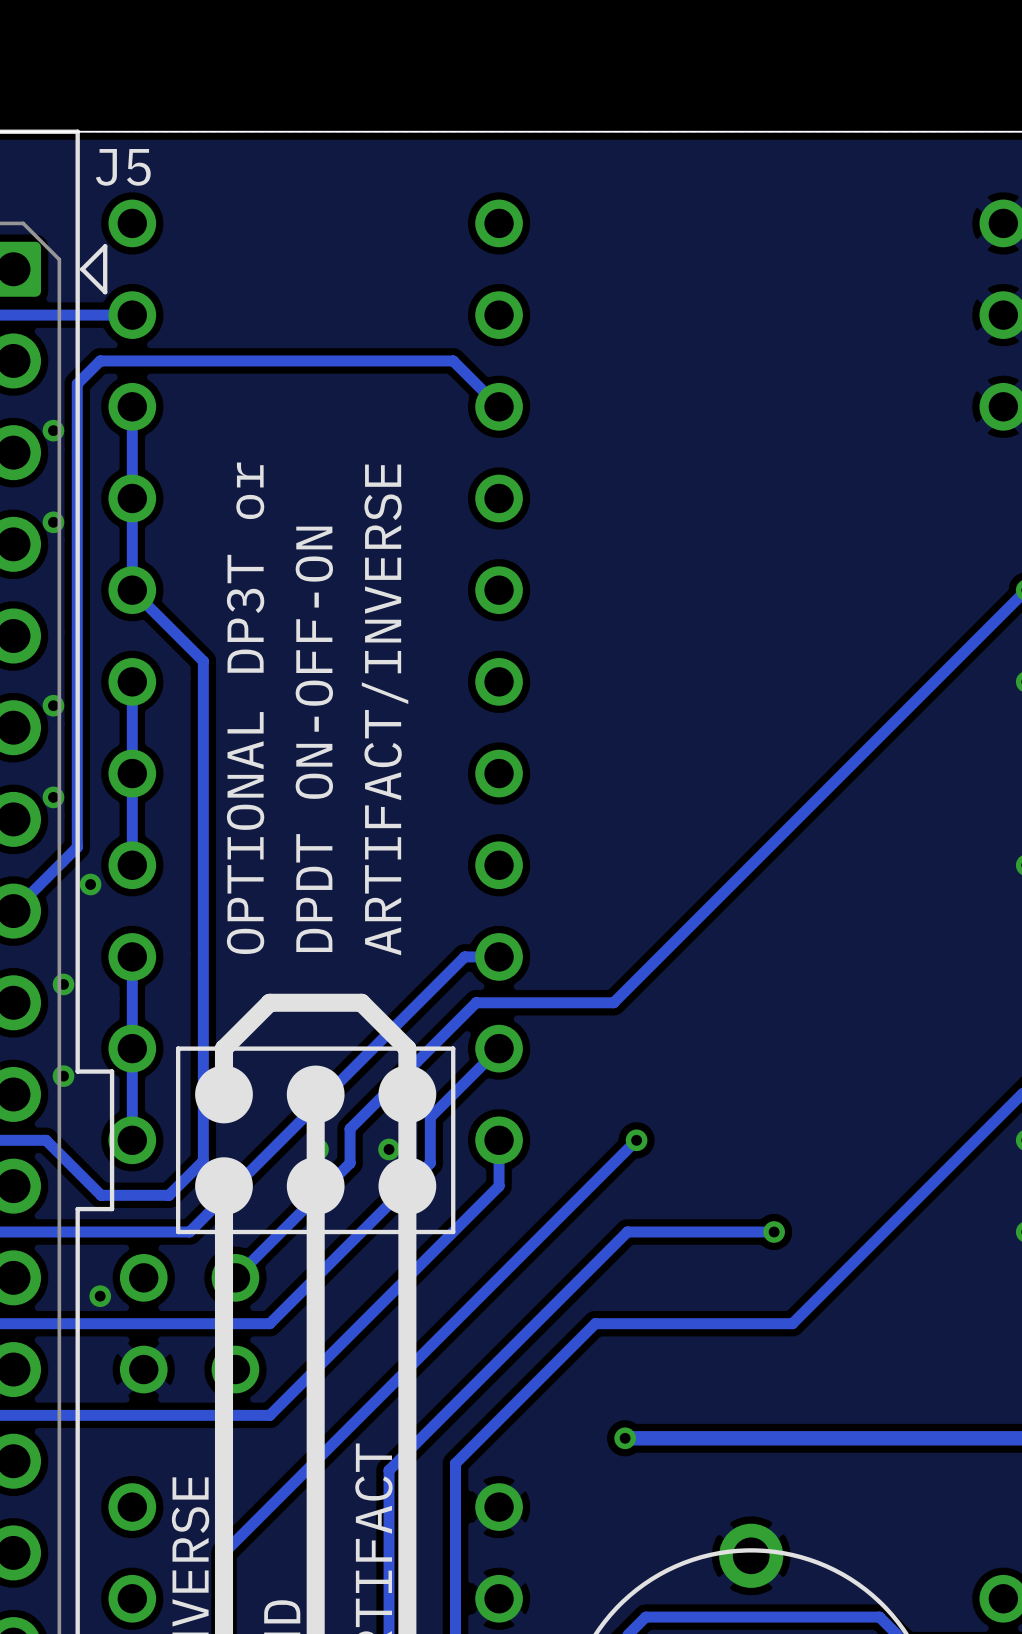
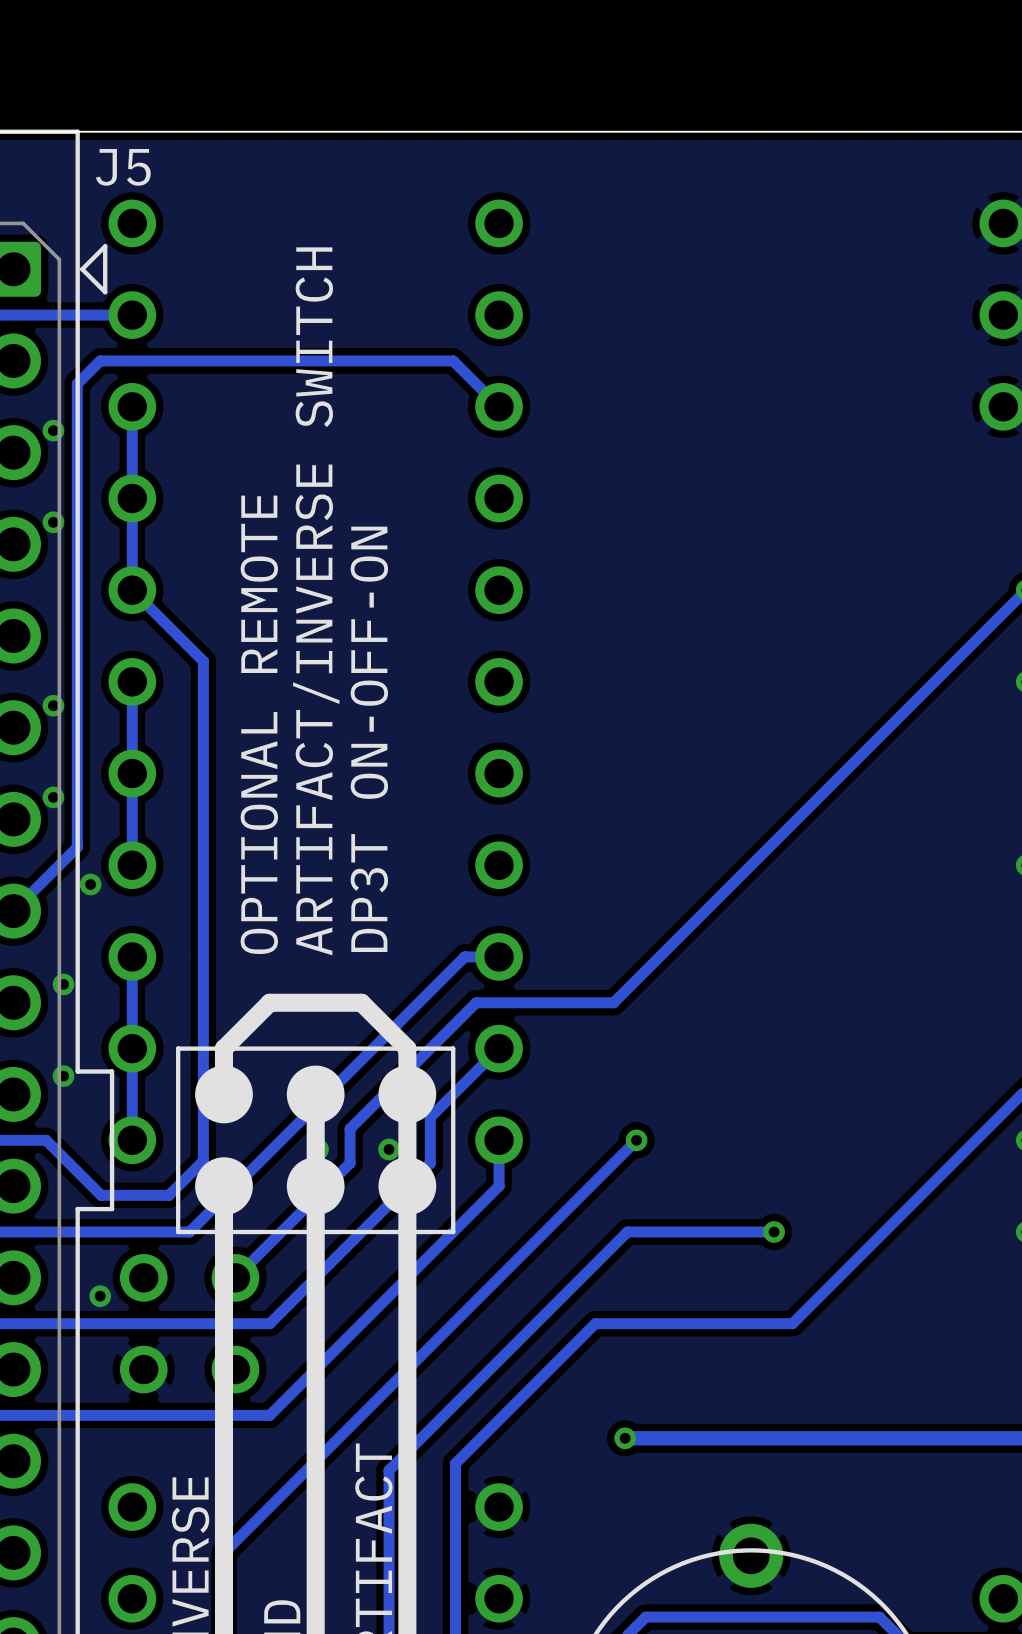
text: OPTIONAL DP3T or (245, 708) -> OPTIONAL REMOTE (259, 724)
text: ARTIFACT/INVERSE (385, 709) -> DP3T ON-OFF-ON (369, 739)
text: DPDT ON-OFF-ON (314, 739) -> ARTIFACT/INVERSE SWITCH (316, 601)

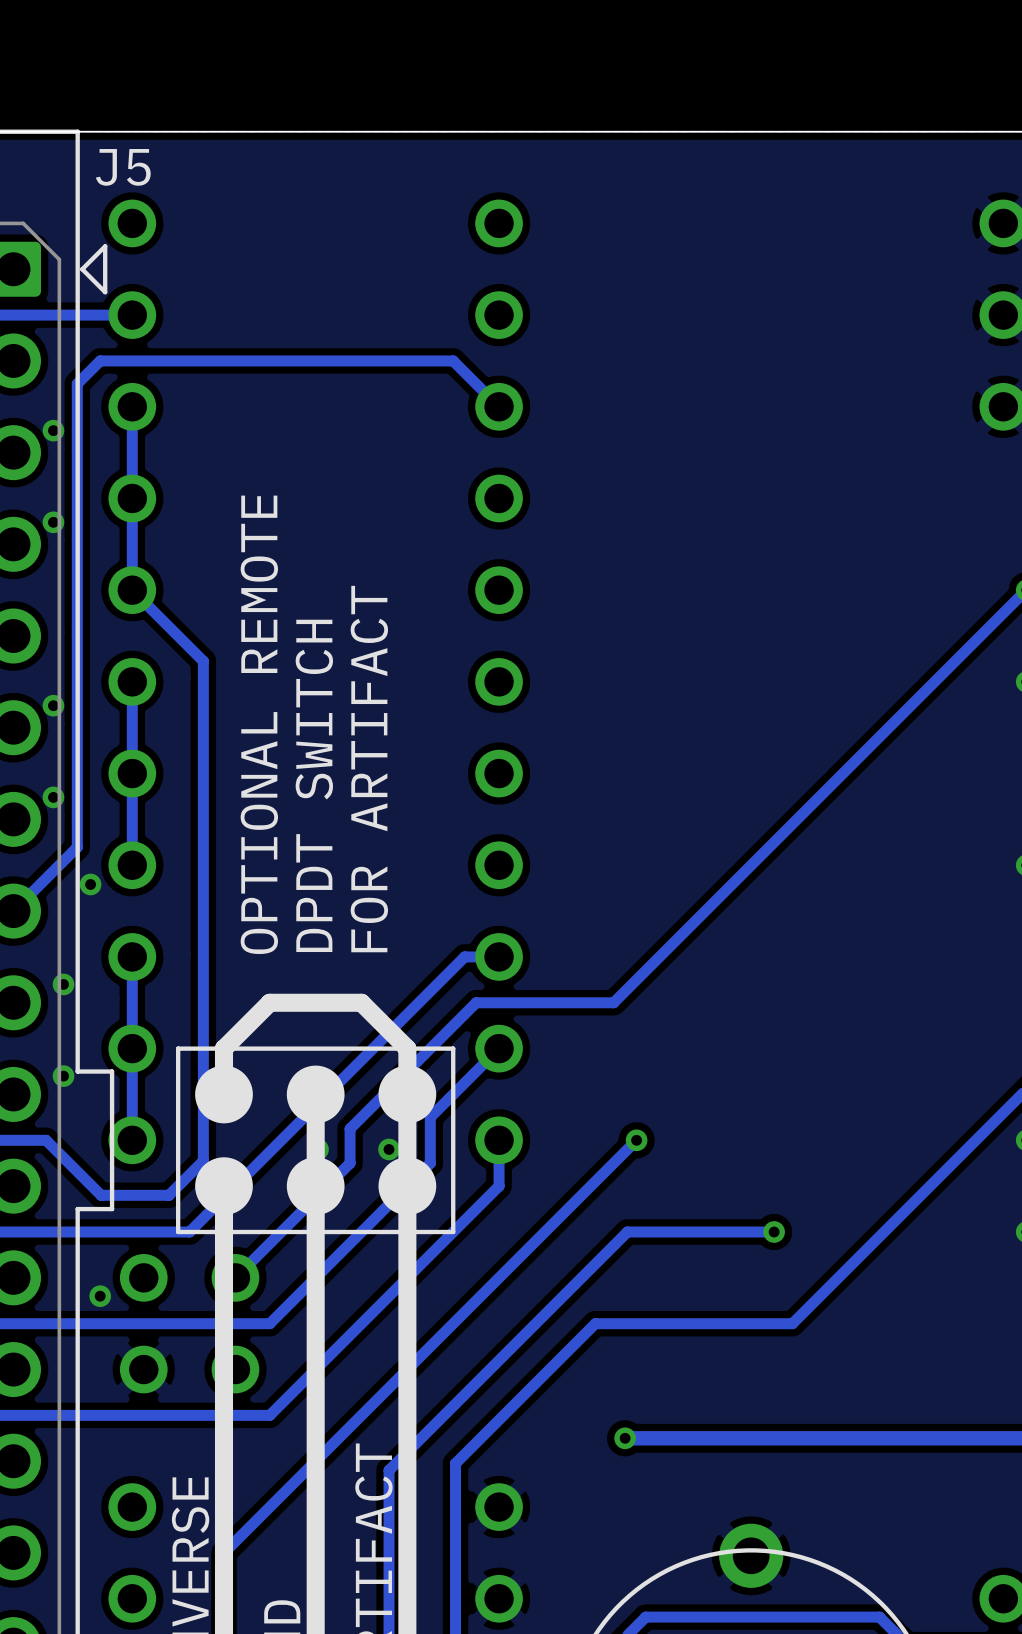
text: ARTIFACT/INVERSE SWITCH (316, 601) -> DPDT SWITCH (314, 785)
text: DP3T ON-OFF-ON (369, 739) -> FOR ARTIFACT (369, 769)

